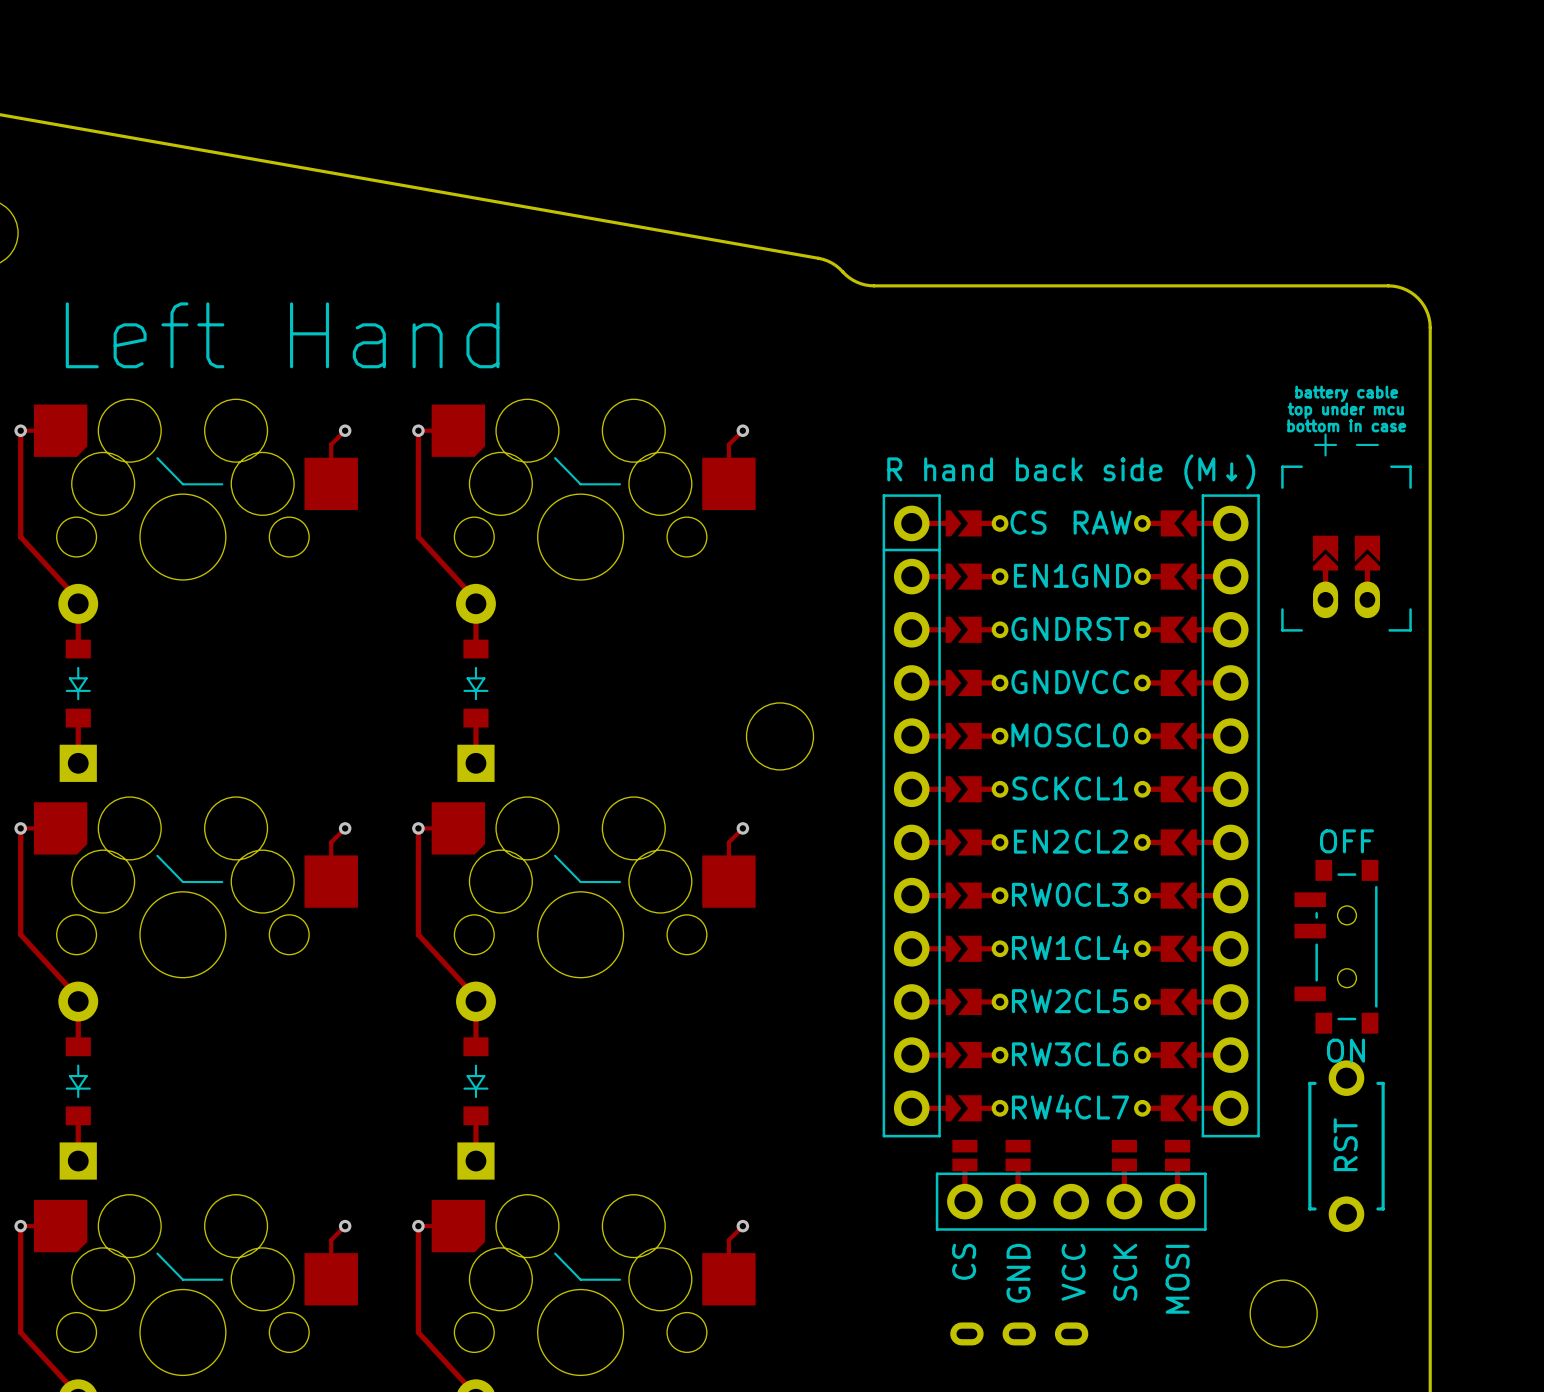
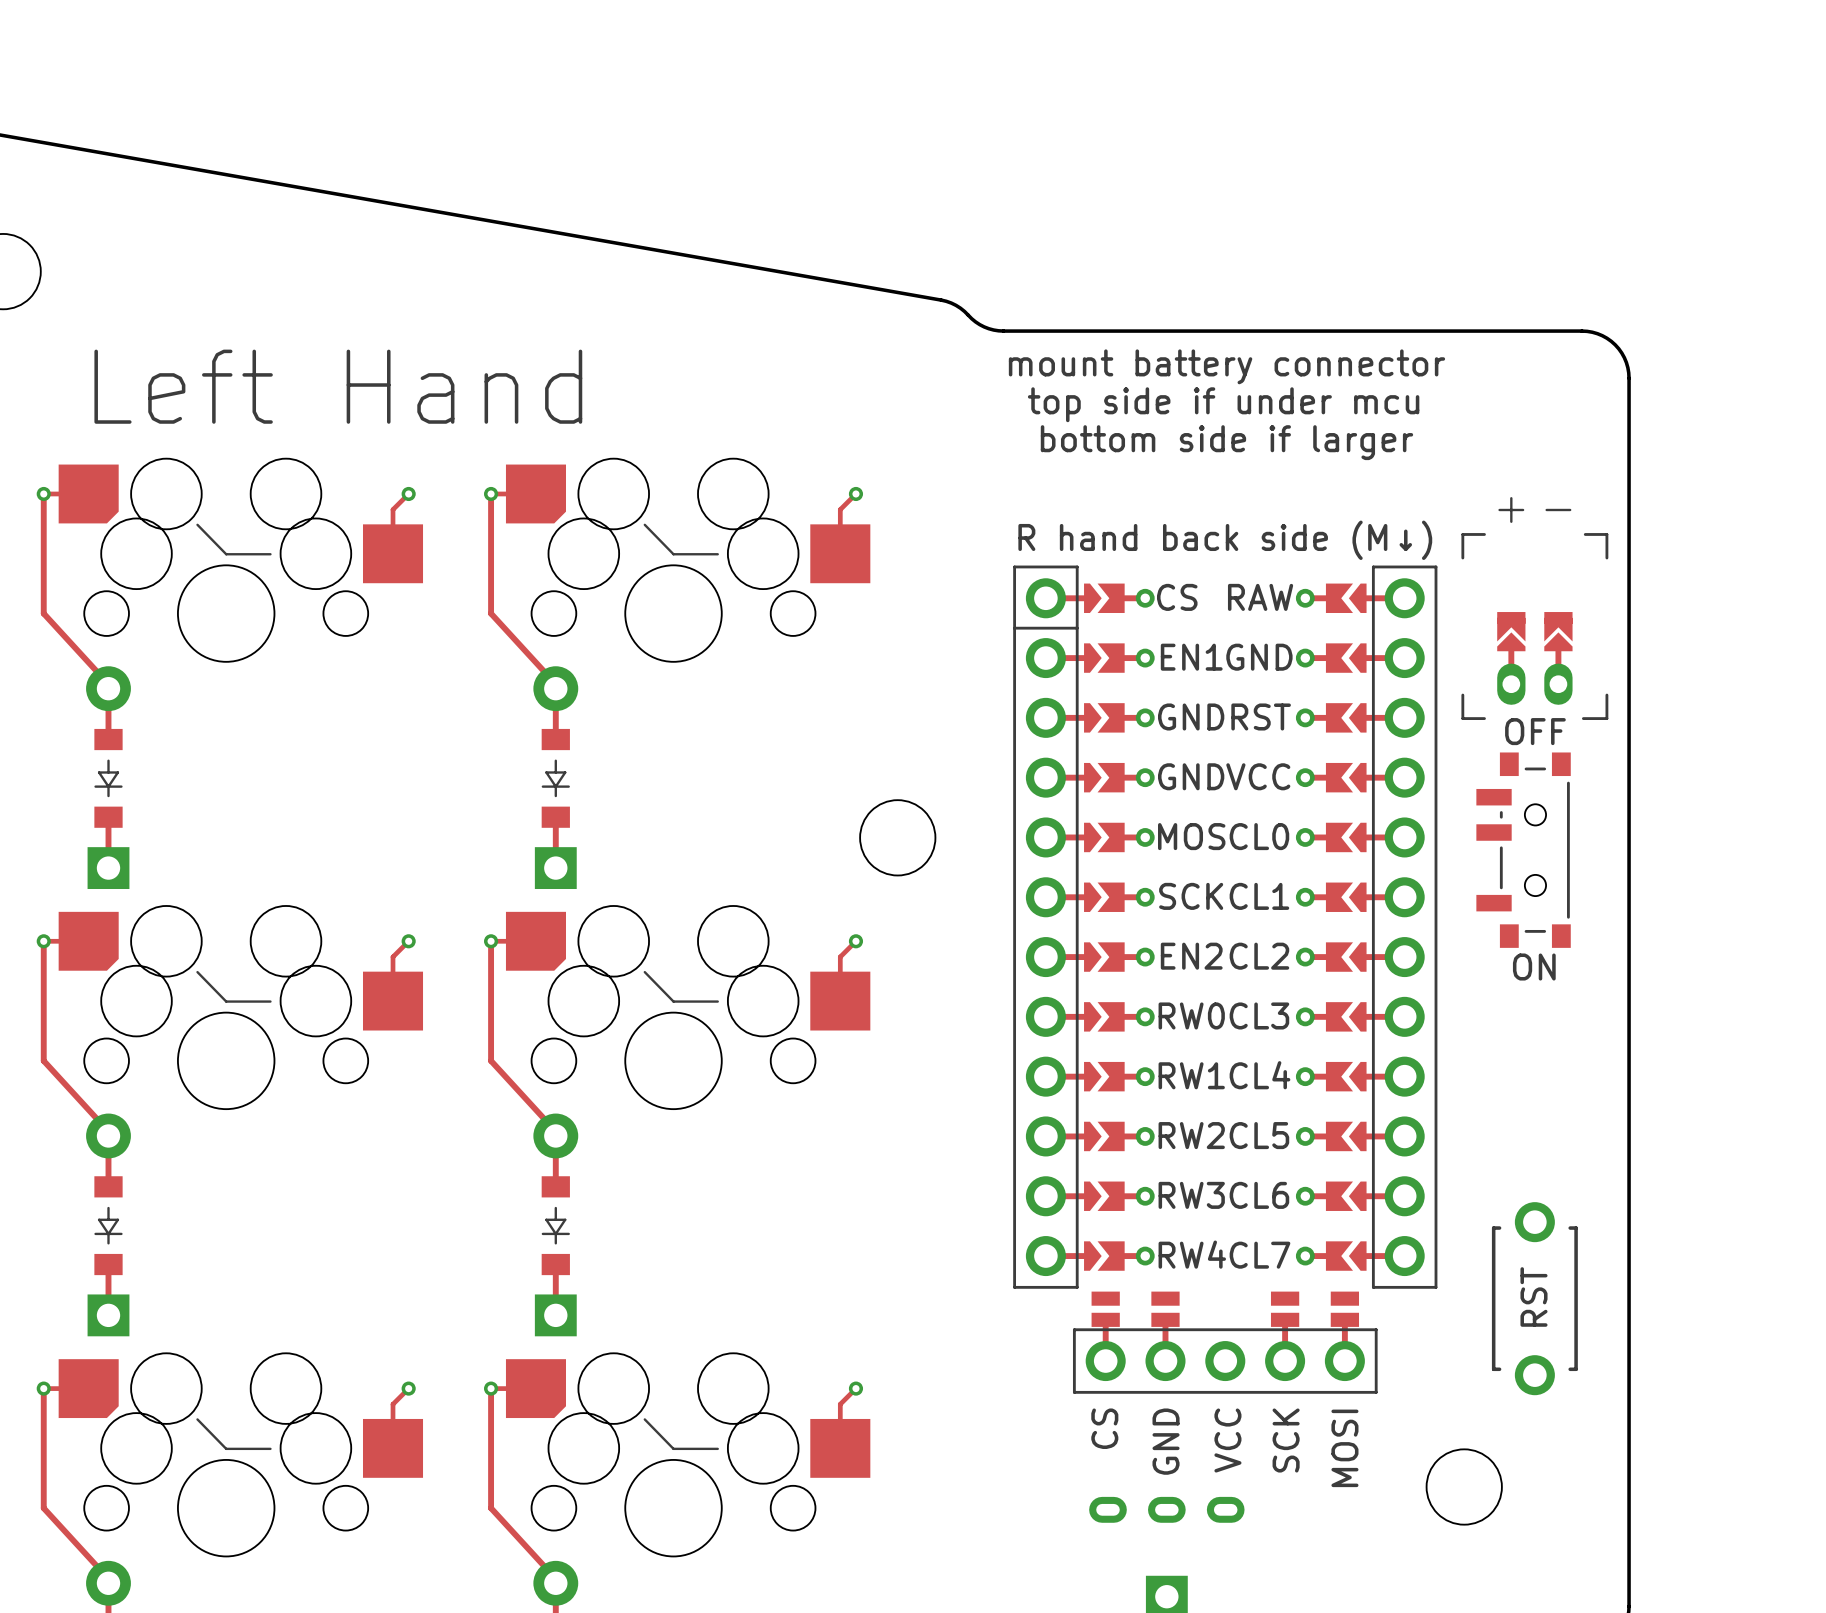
text: none -> mount battery connector (1226, 366)
text: none -> top side if under mcu (1223, 404)
text: none -> bottom side if larger (1226, 442)
text: battery cable (1346, 393) -> none
text: top under mcu (1345, 410) -> none
text: bottom in case (1346, 425) -> none
part position: (1336, 946) -> (1523, 850)

